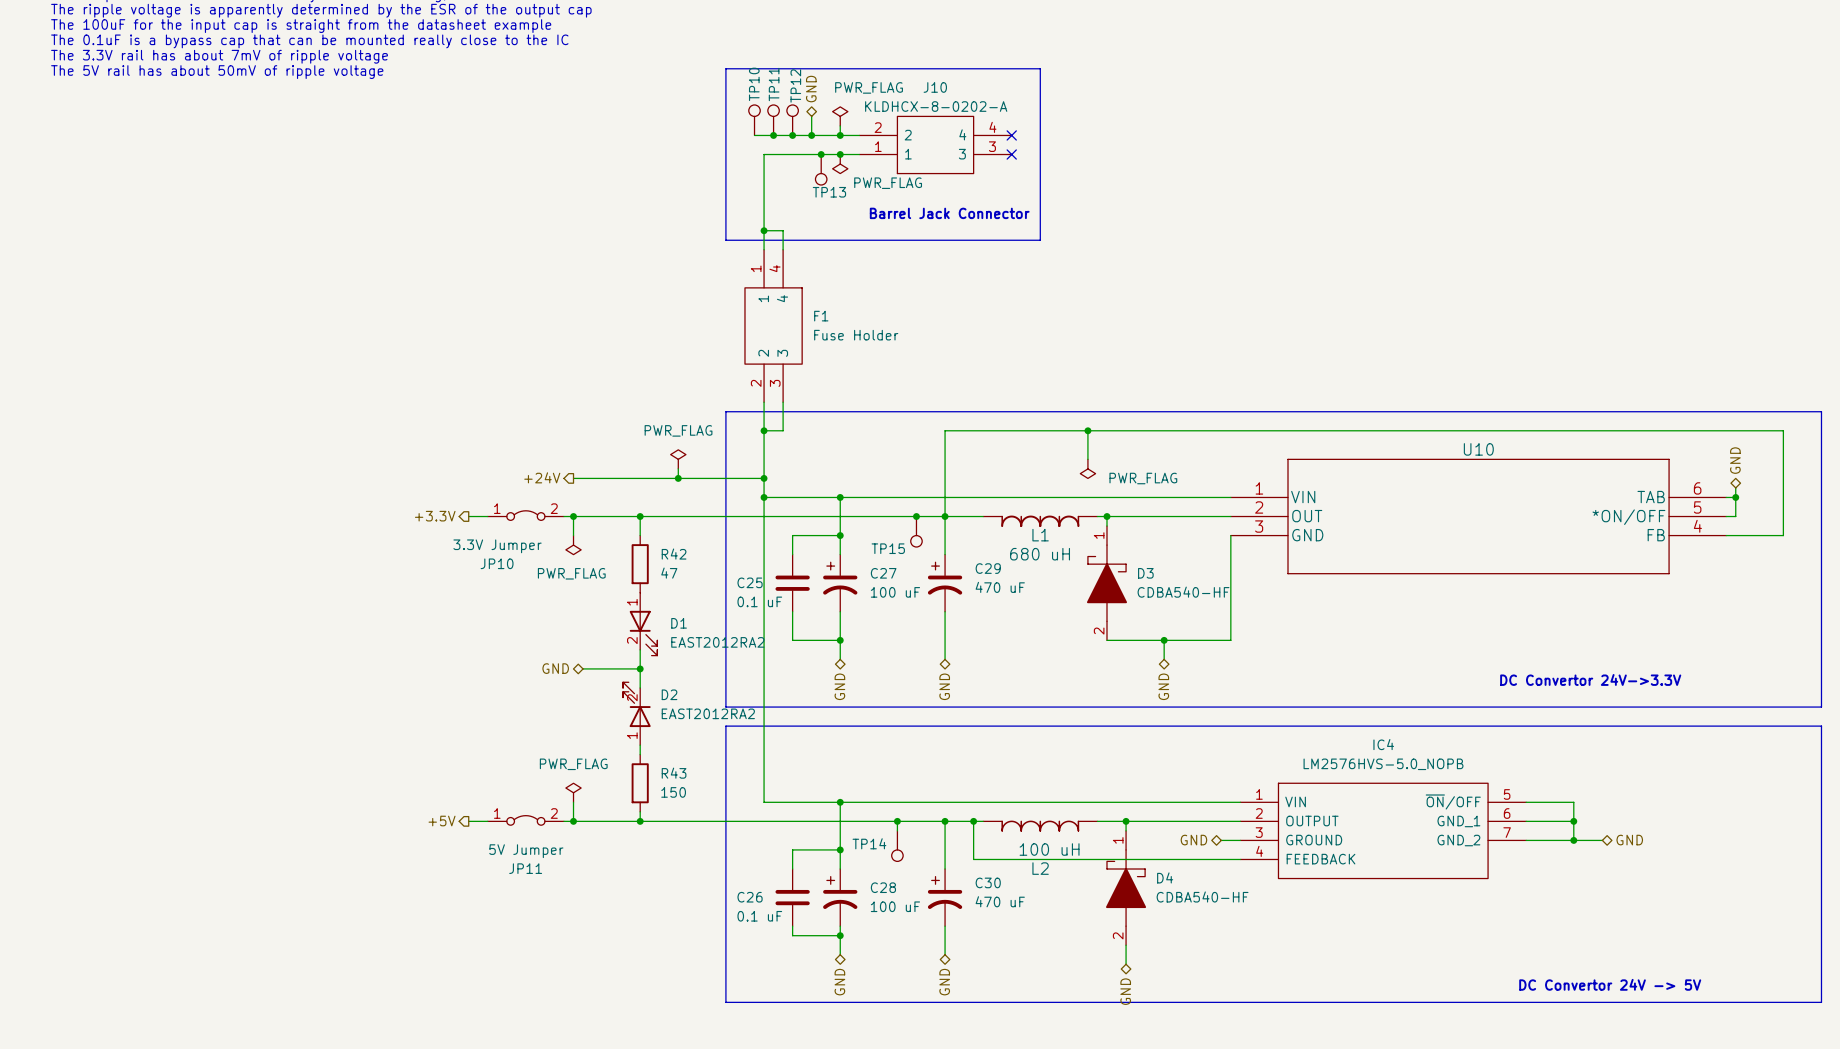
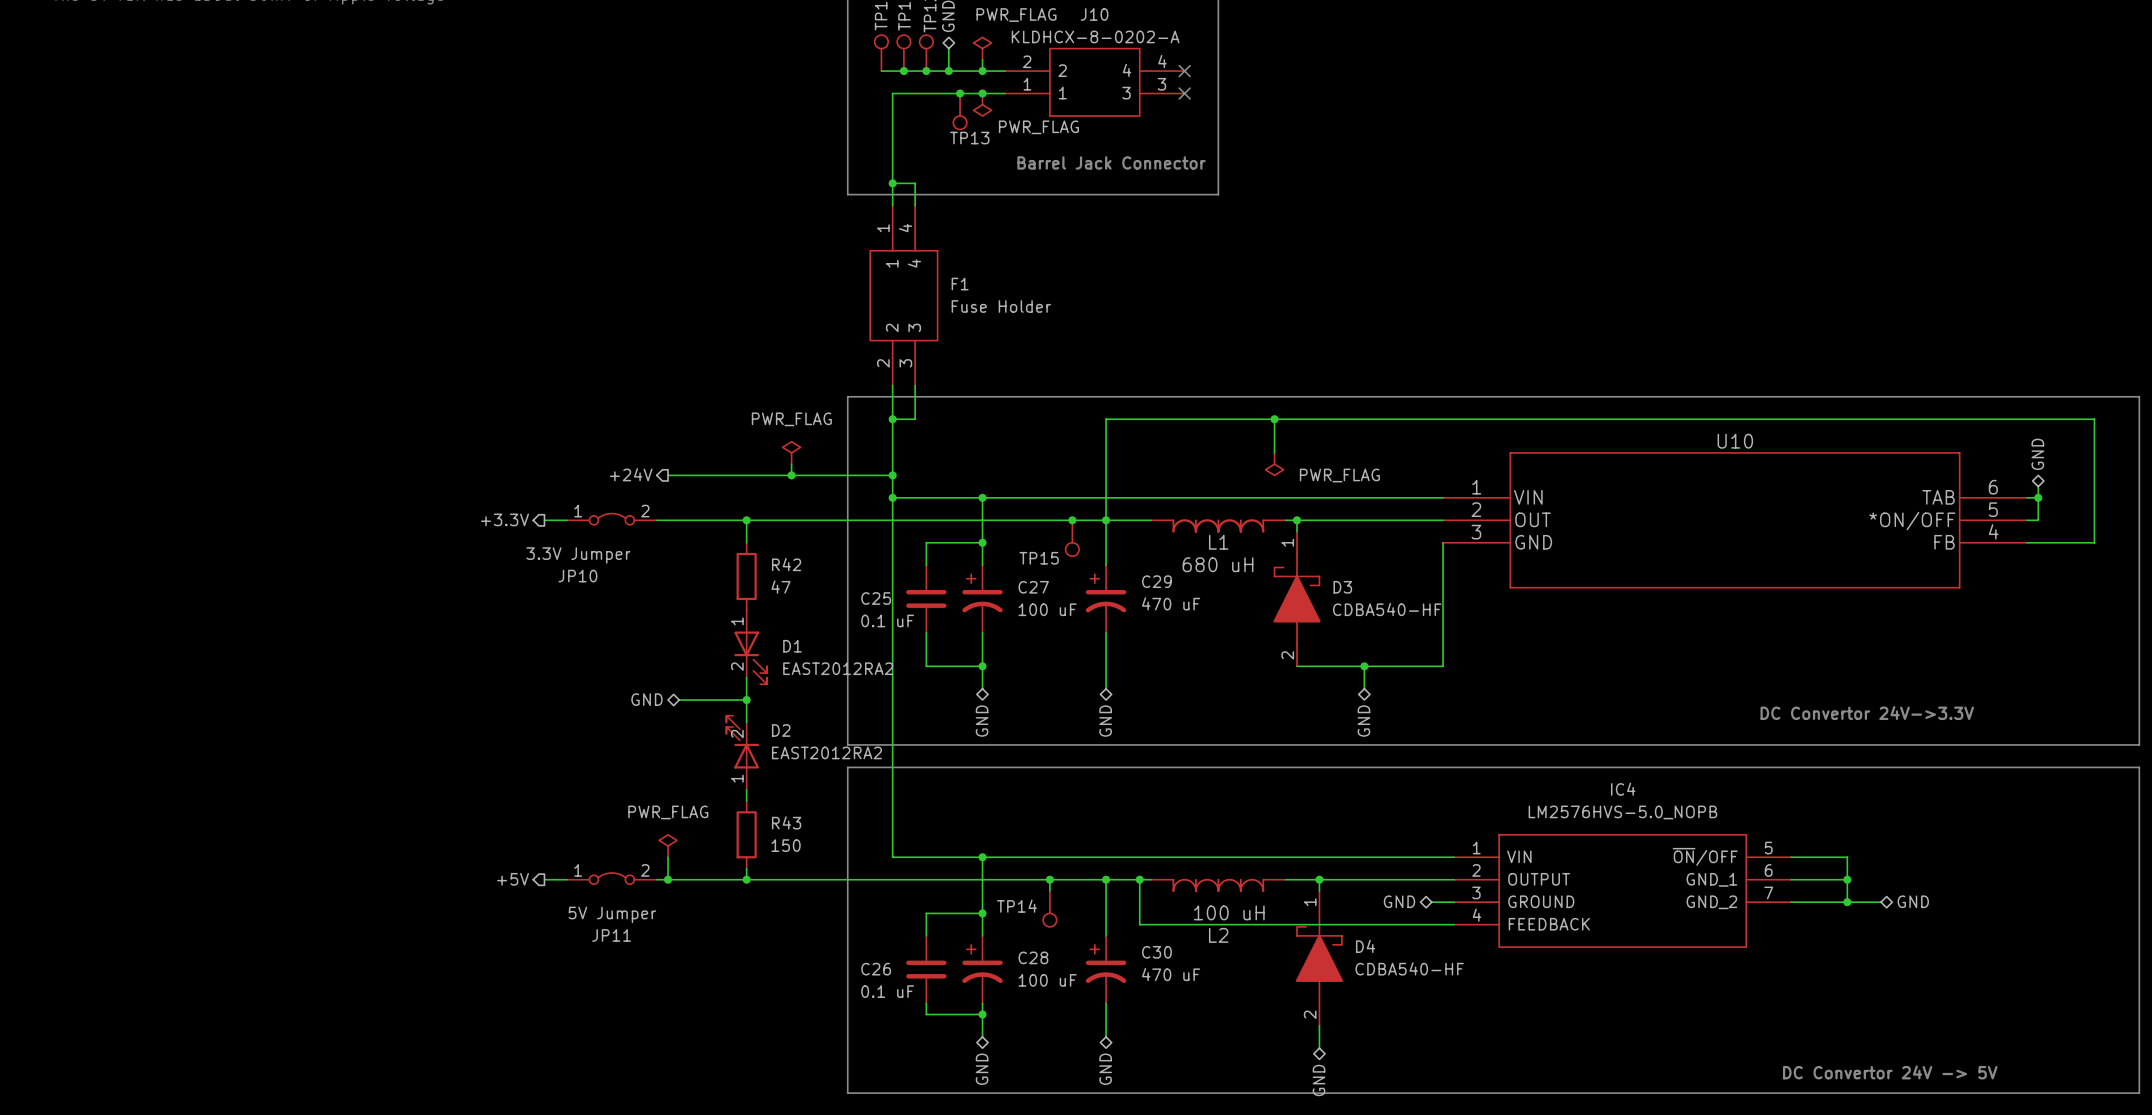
wire: (573, 516) (573, 535) -> none
junction: (573, 516) -> none
power symbol: PWR_FLAG (573, 545) -> none

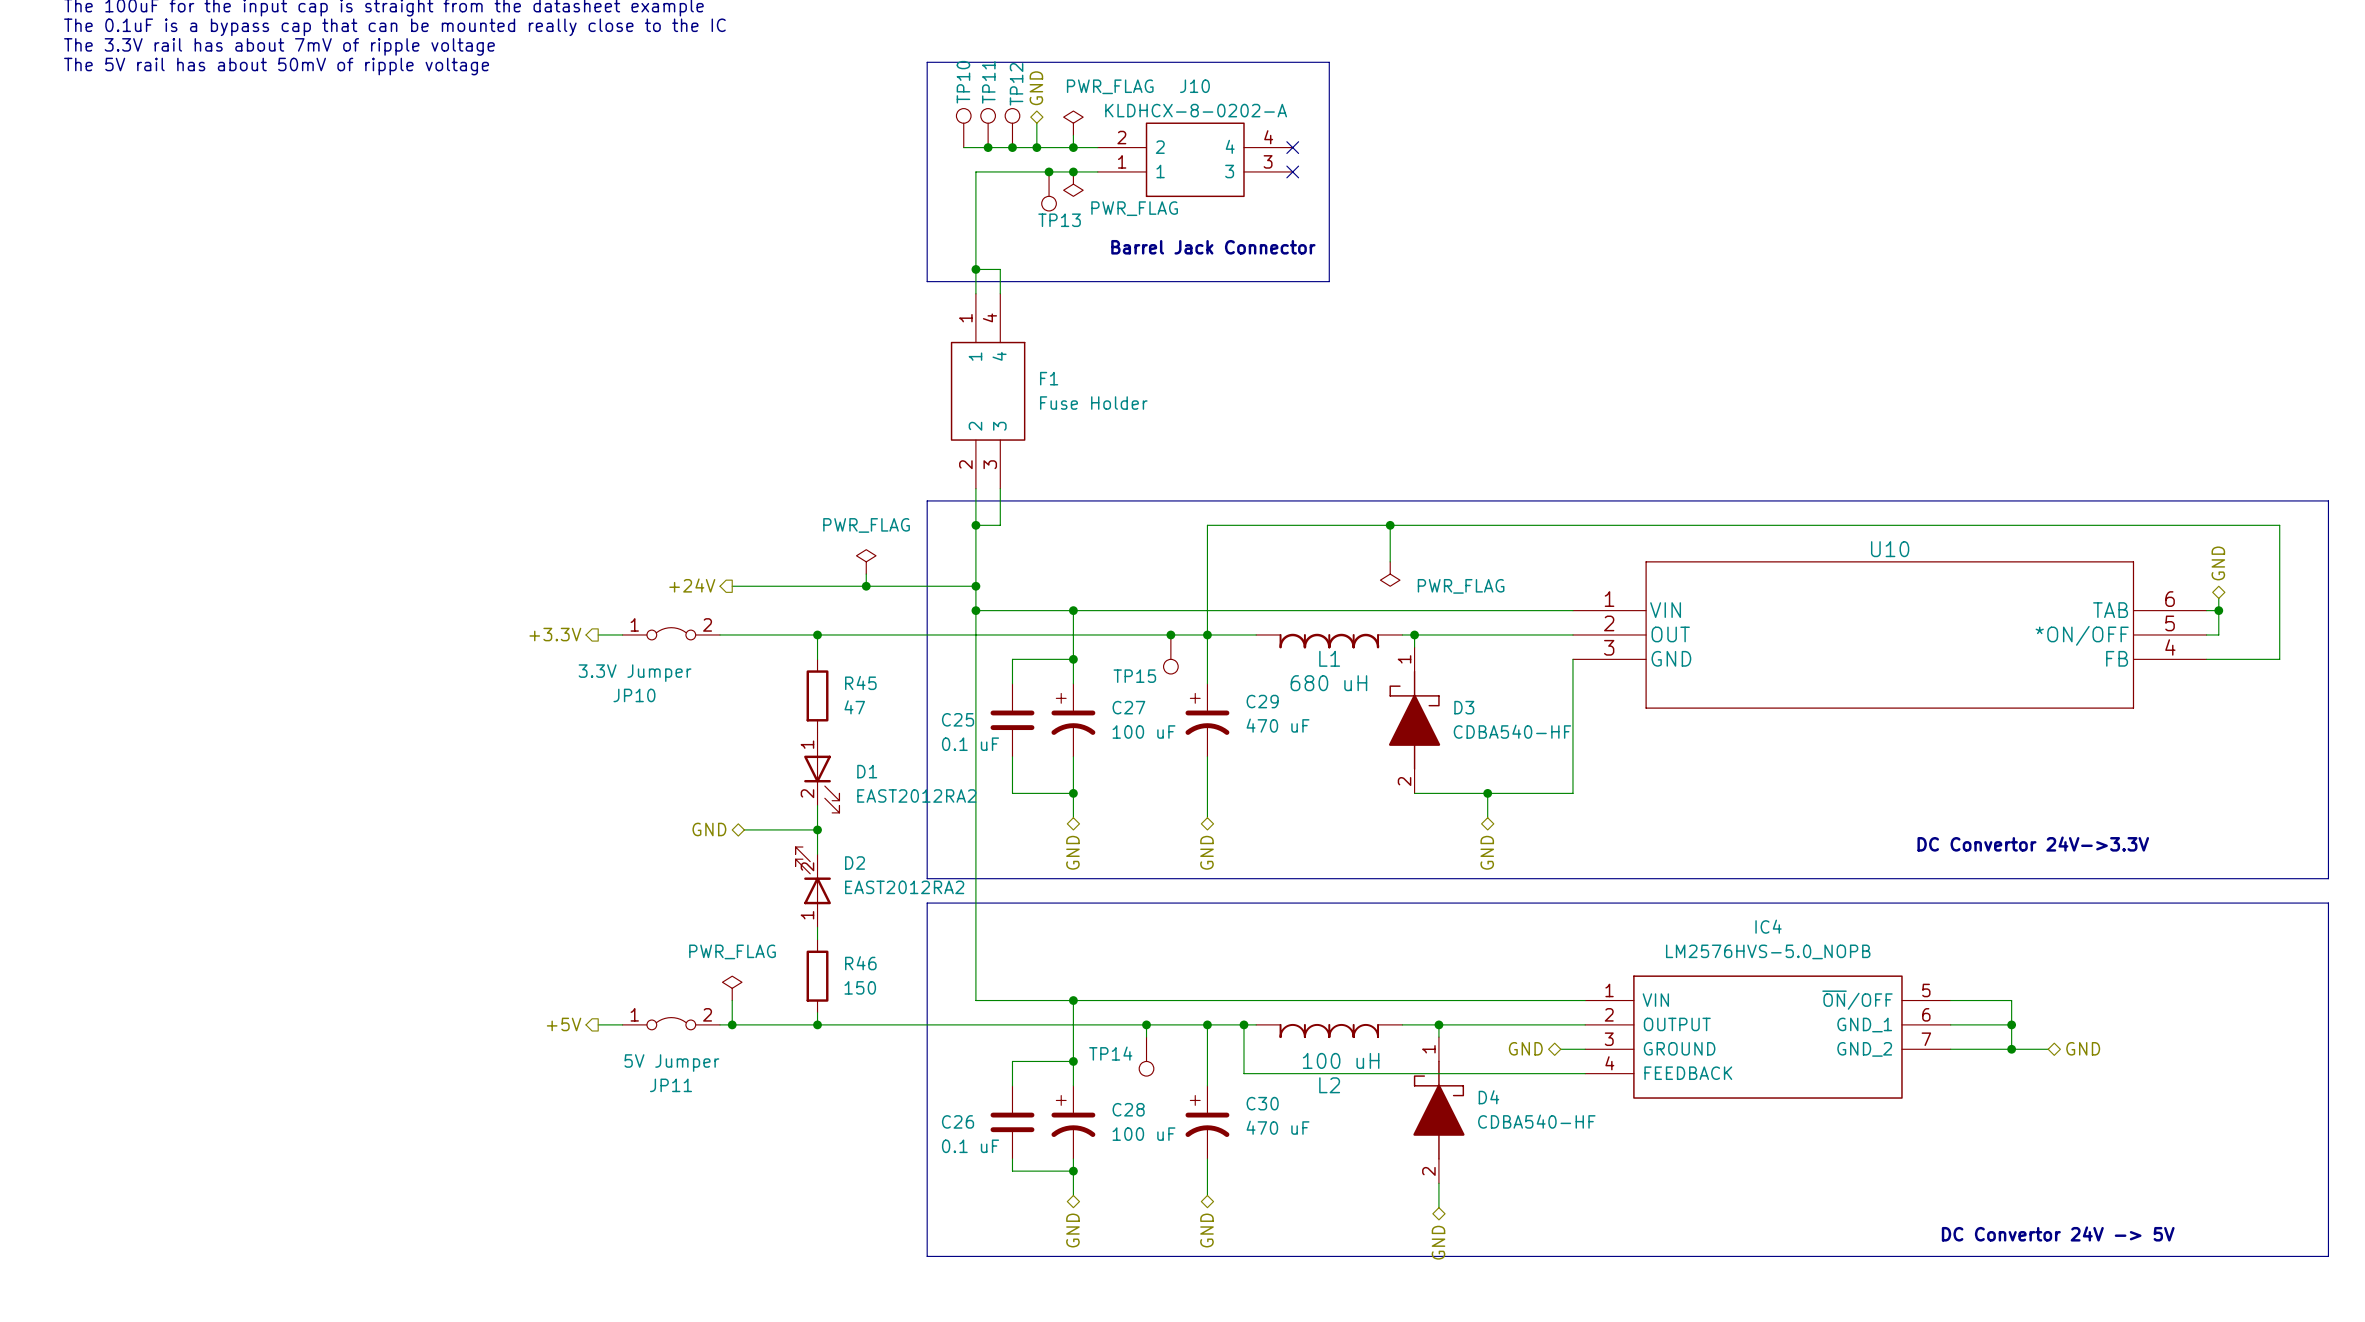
R42 name: R42 (786, 564) -> R45 (860, 682)
R43 name: R43 (786, 822) -> R46 (860, 963)

